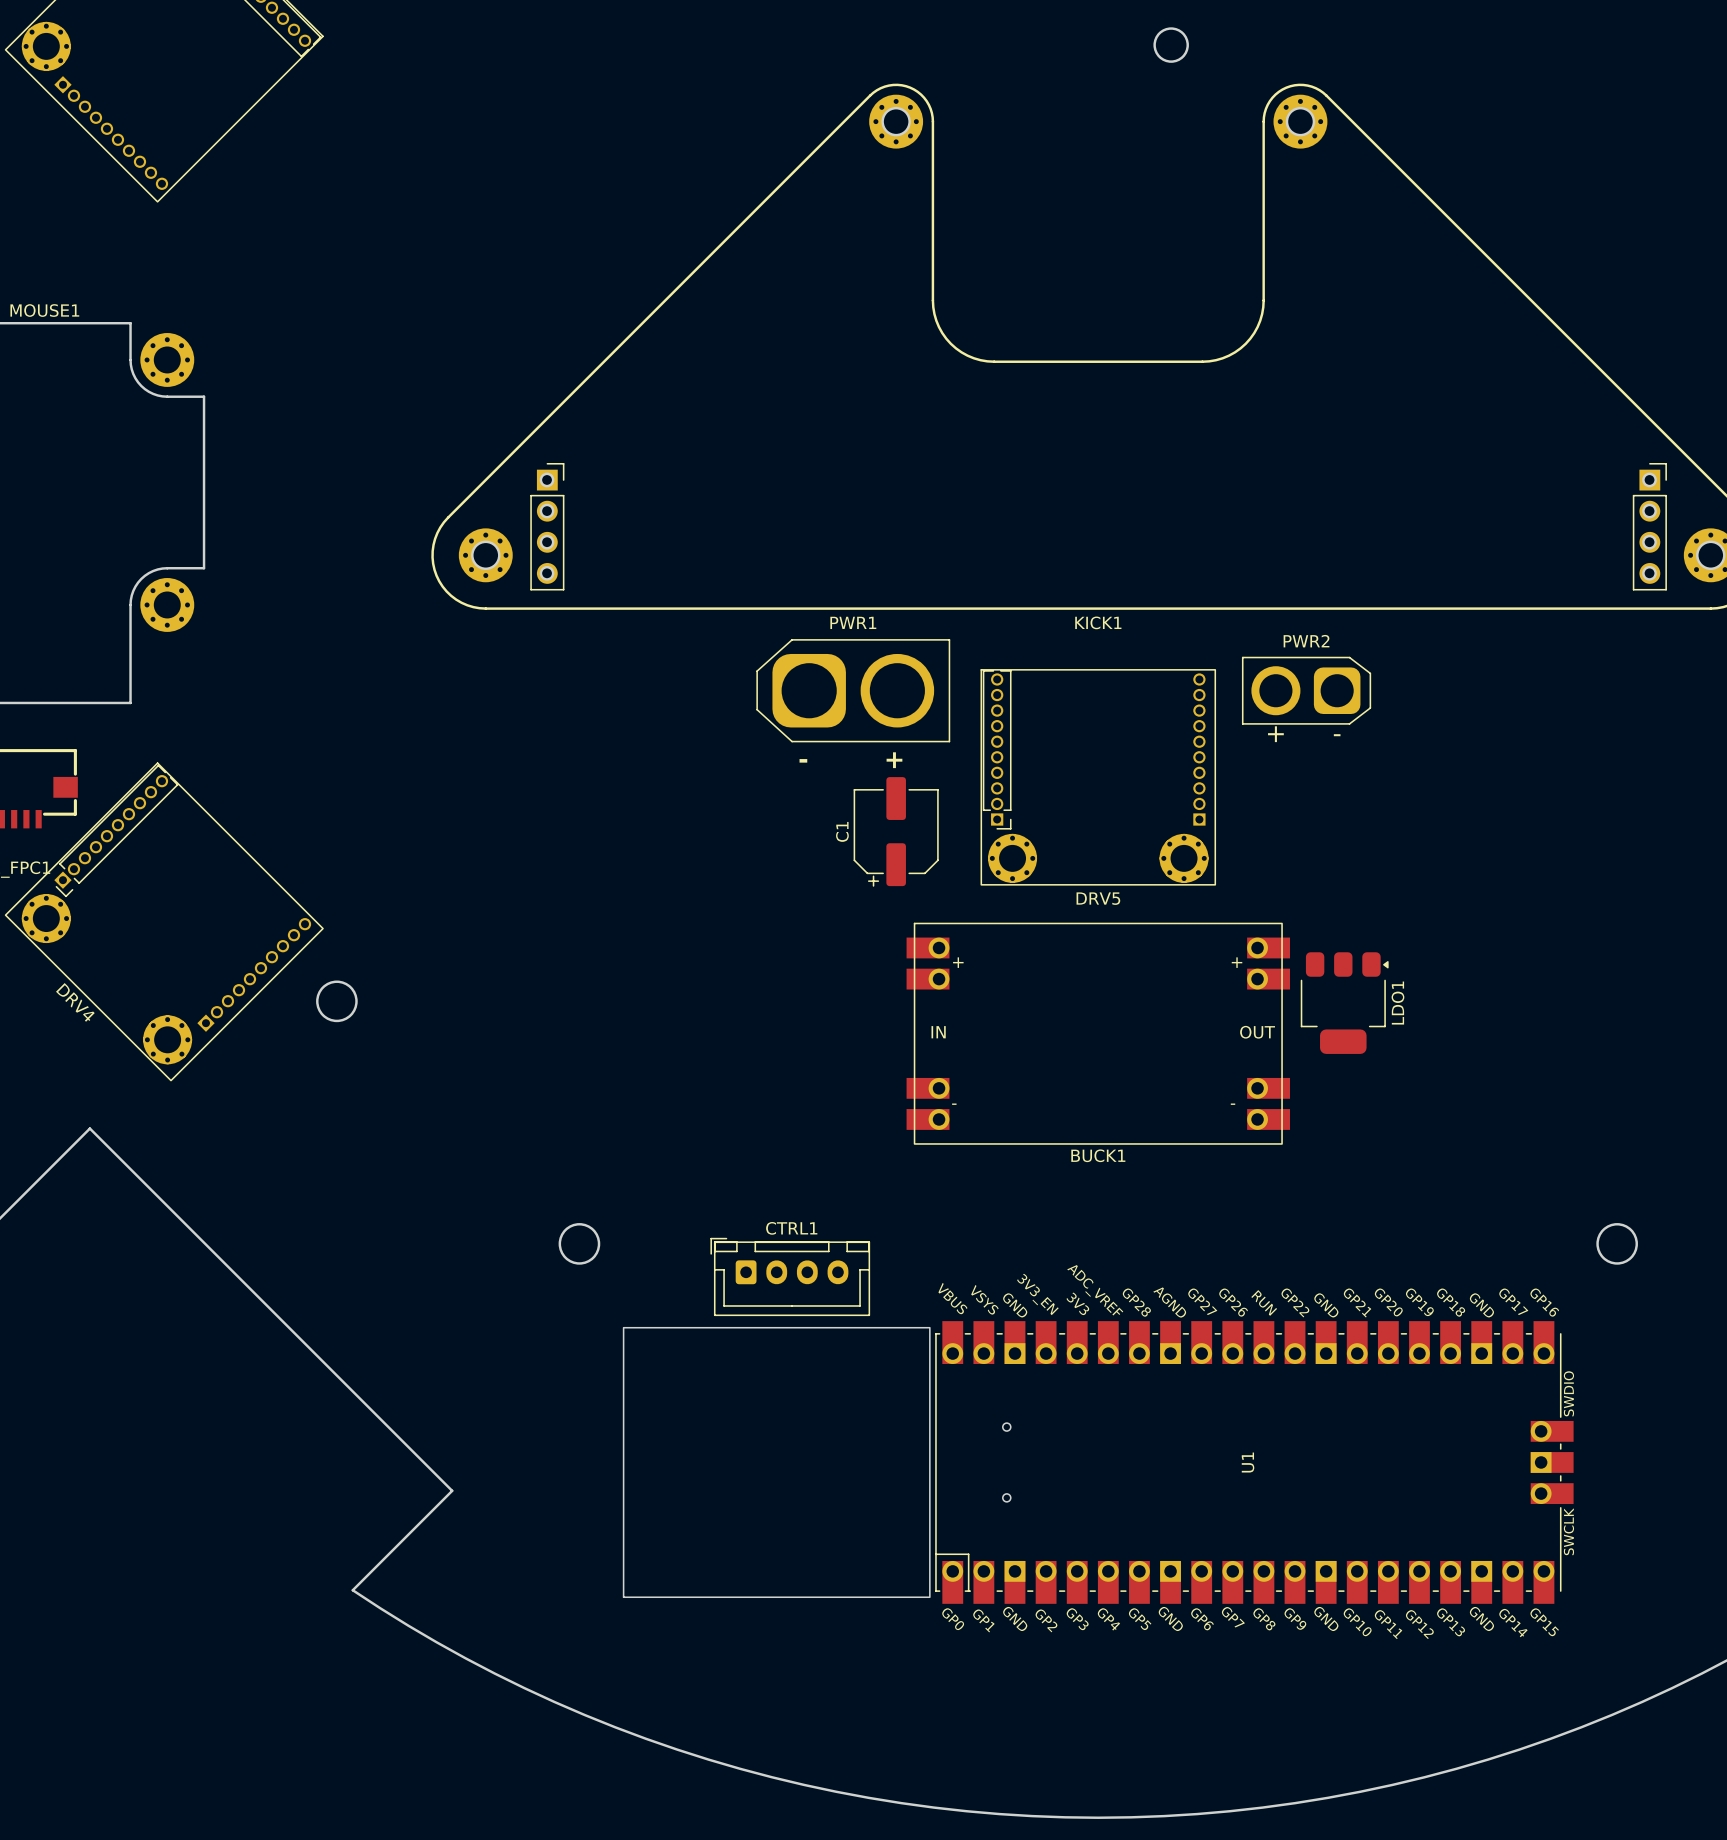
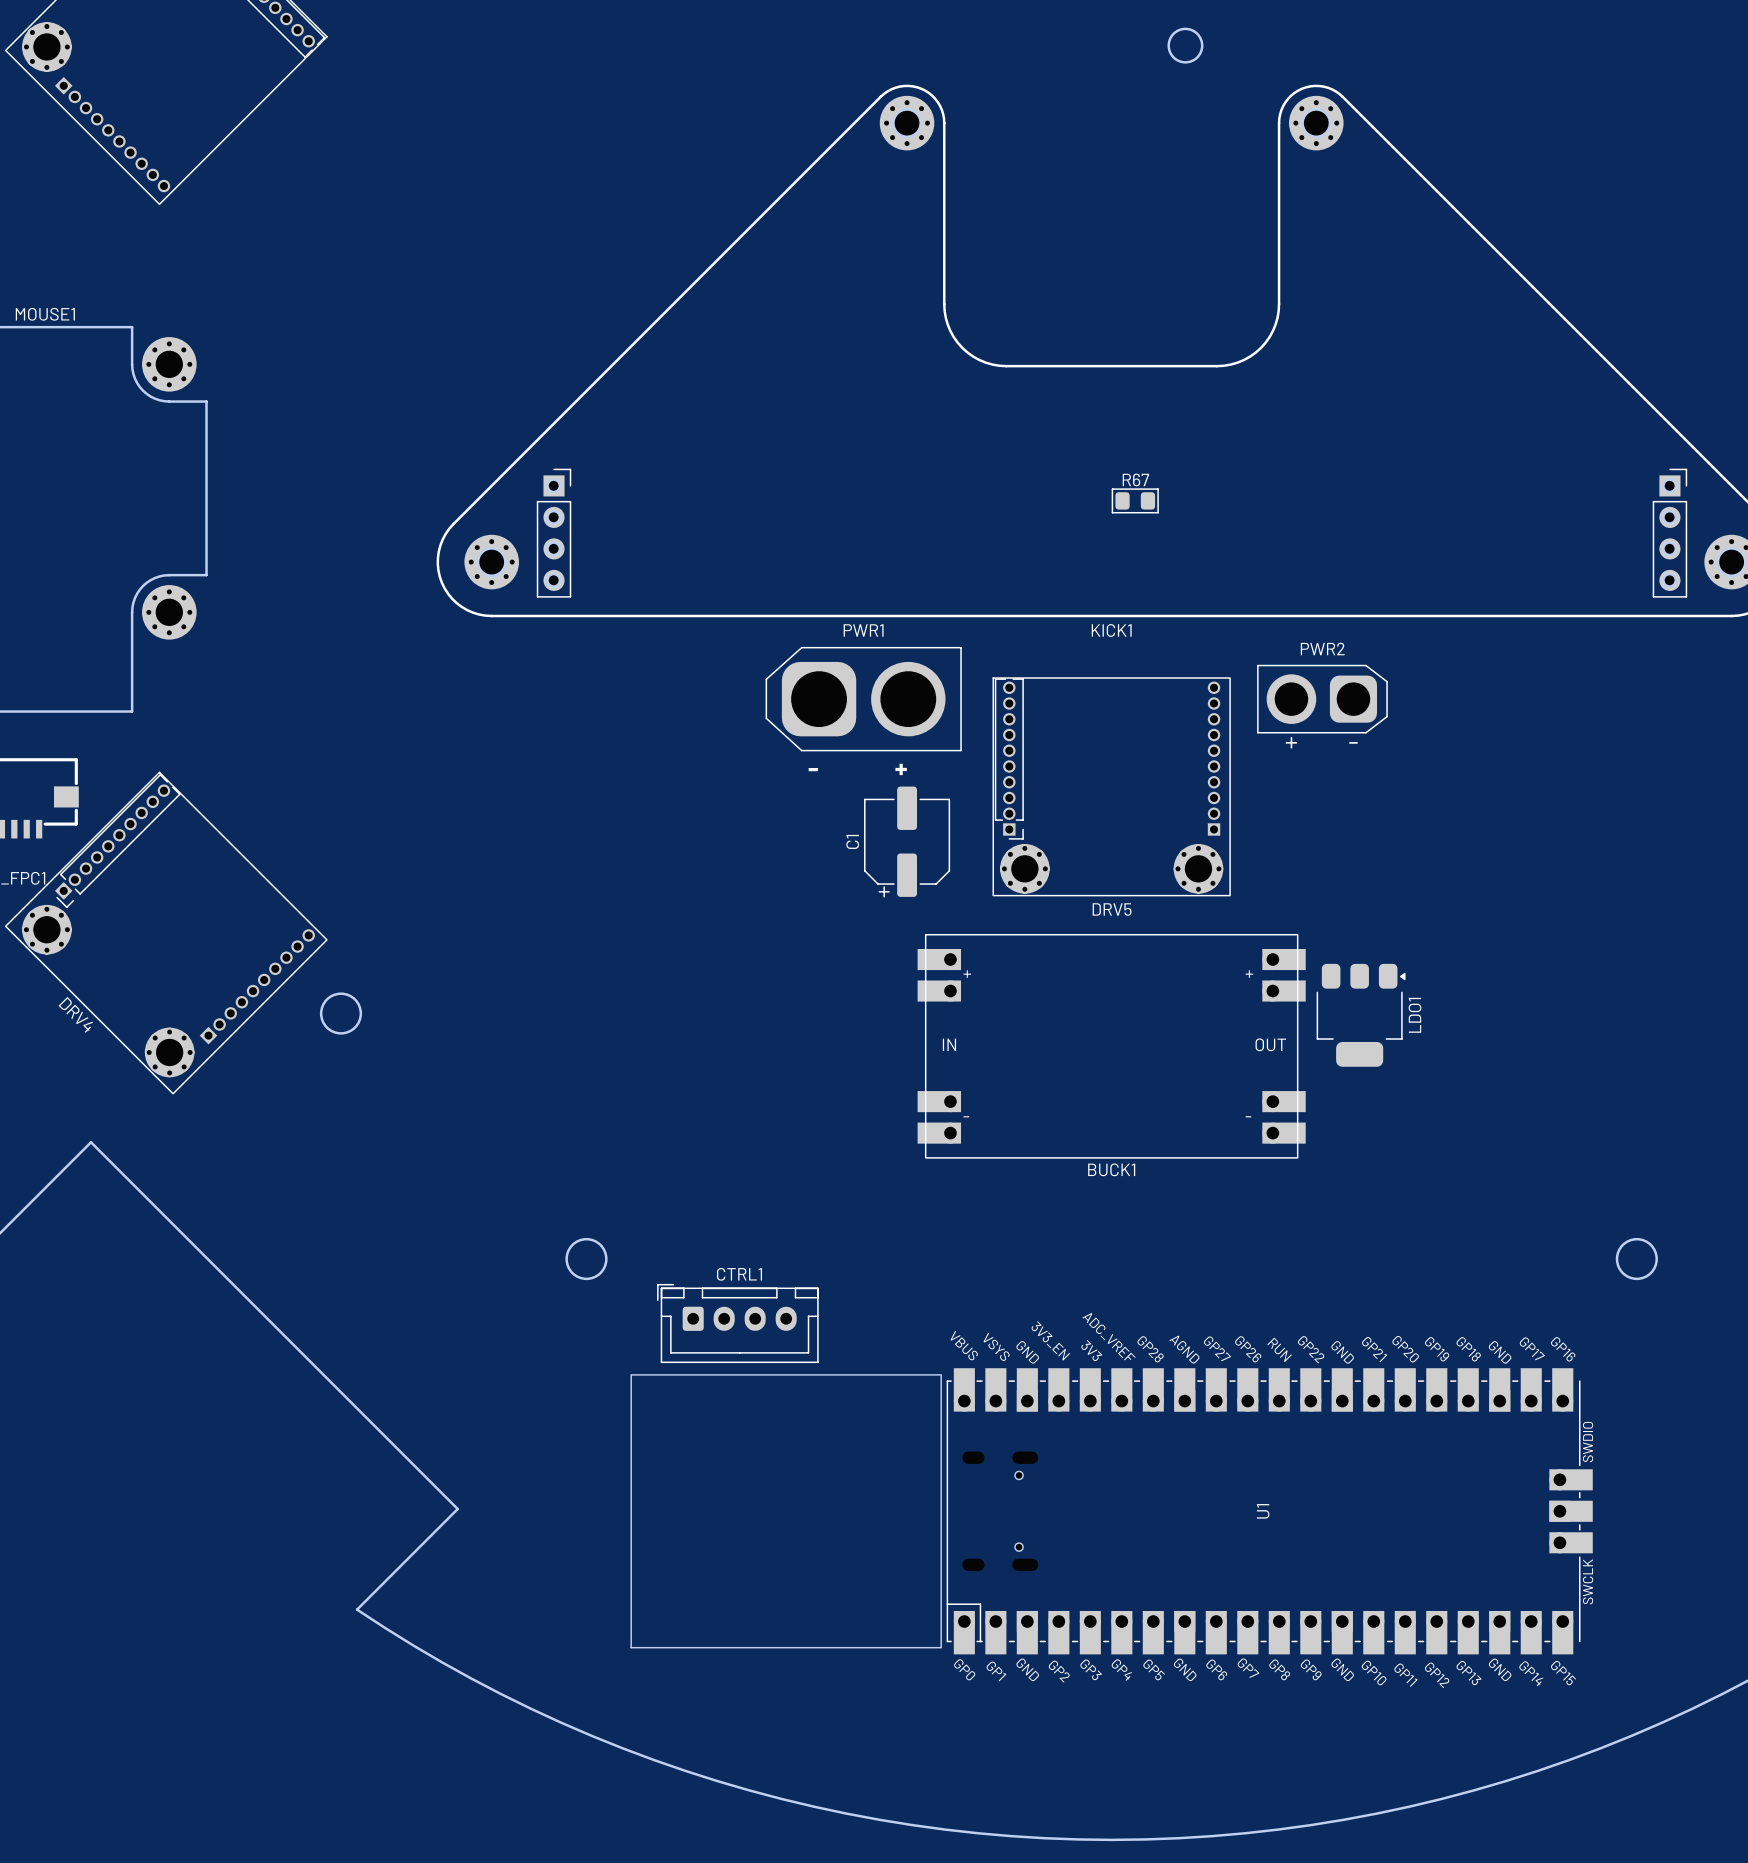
R67: none -> (1135, 500)
CTRL1 position: (790, 1276) -> (737, 1323)
U1 position: (1098, 1462) -> (1111, 1511)

